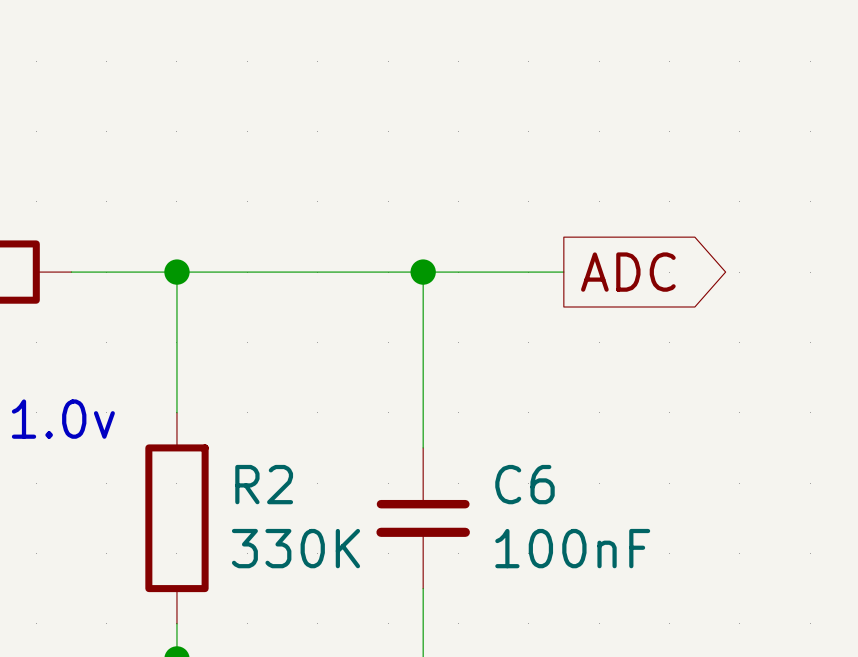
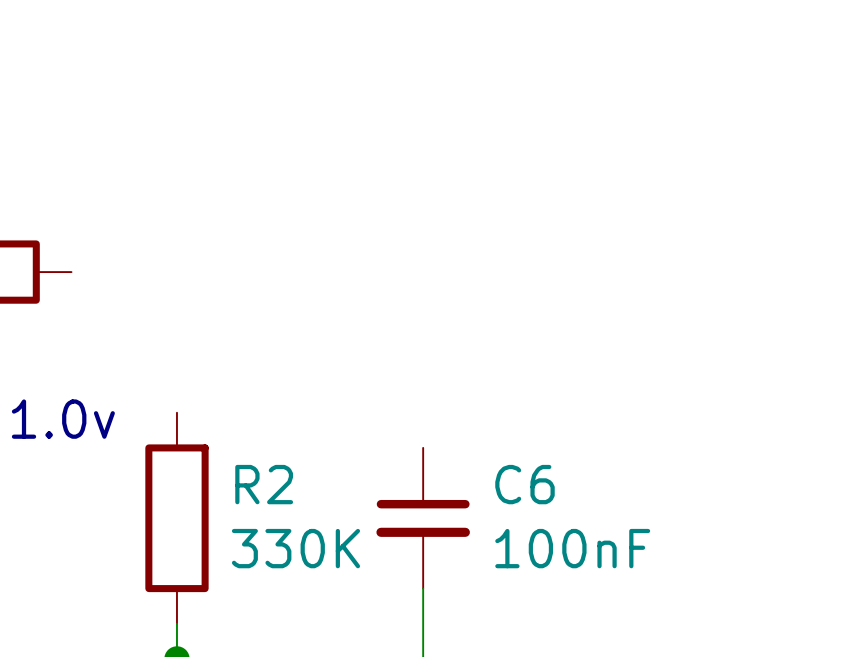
wire: (71, 272) (563, 272) -> none
wire: (176, 272) (176, 412) -> none
junction: (176, 272) -> none
wire: (423, 272) (423, 447) -> none
junction: (423, 272) -> none
global label: ADC (628, 272) -> none

